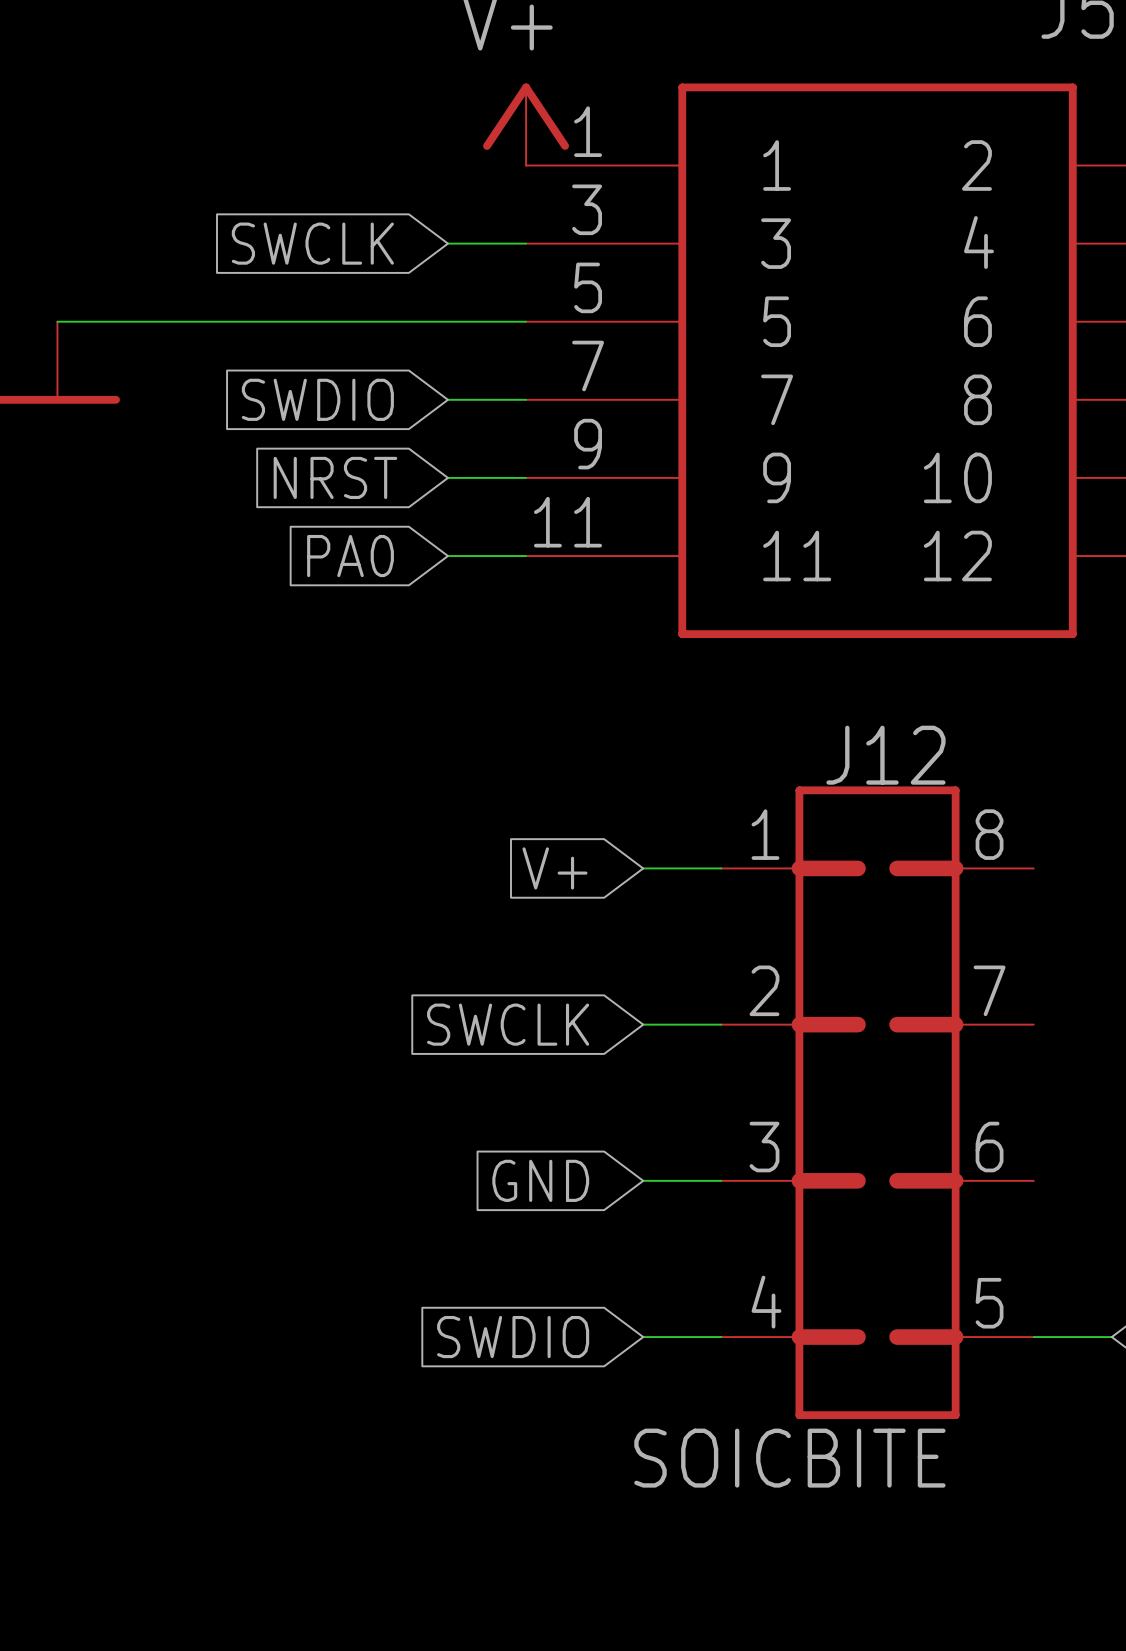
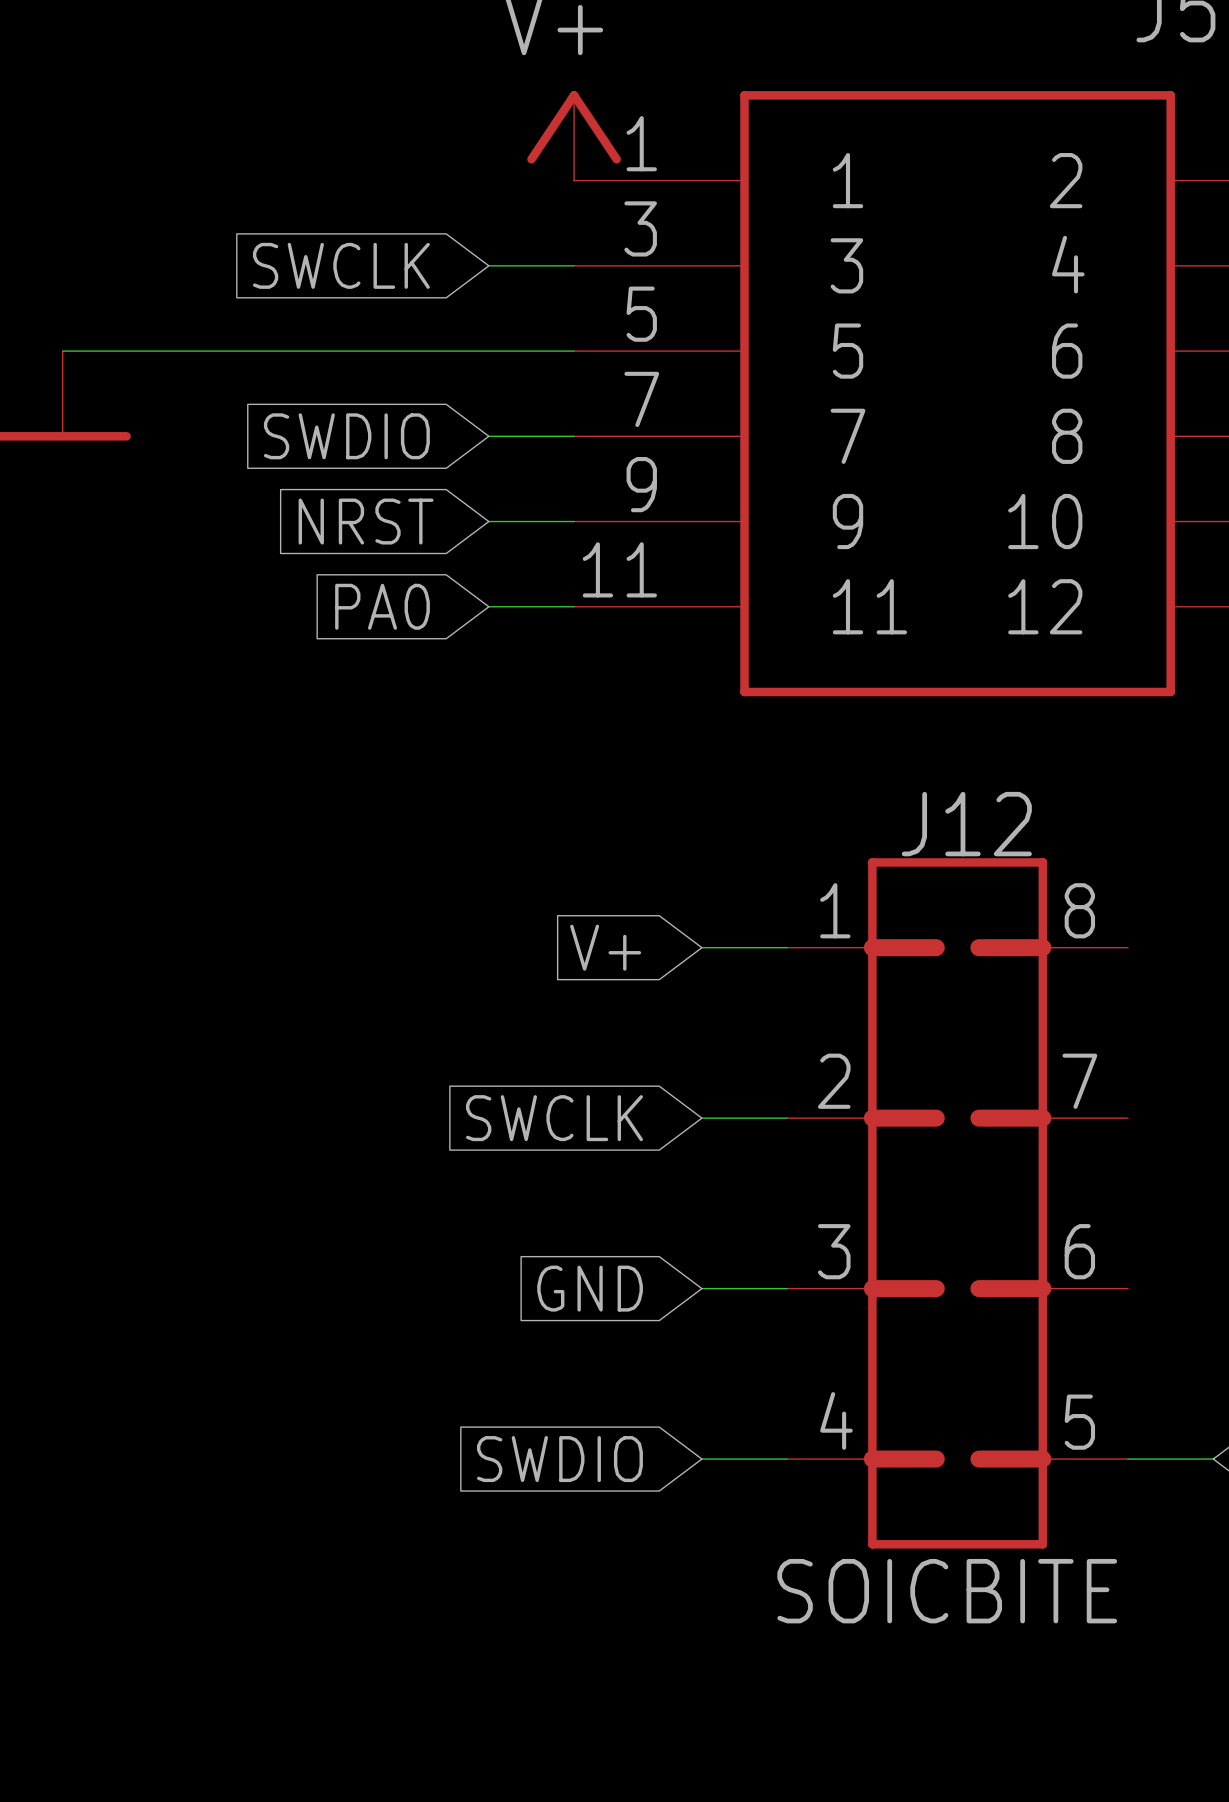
J12 value position: SOICBITE (789, 1458) -> SOICBITE (947, 1591)

